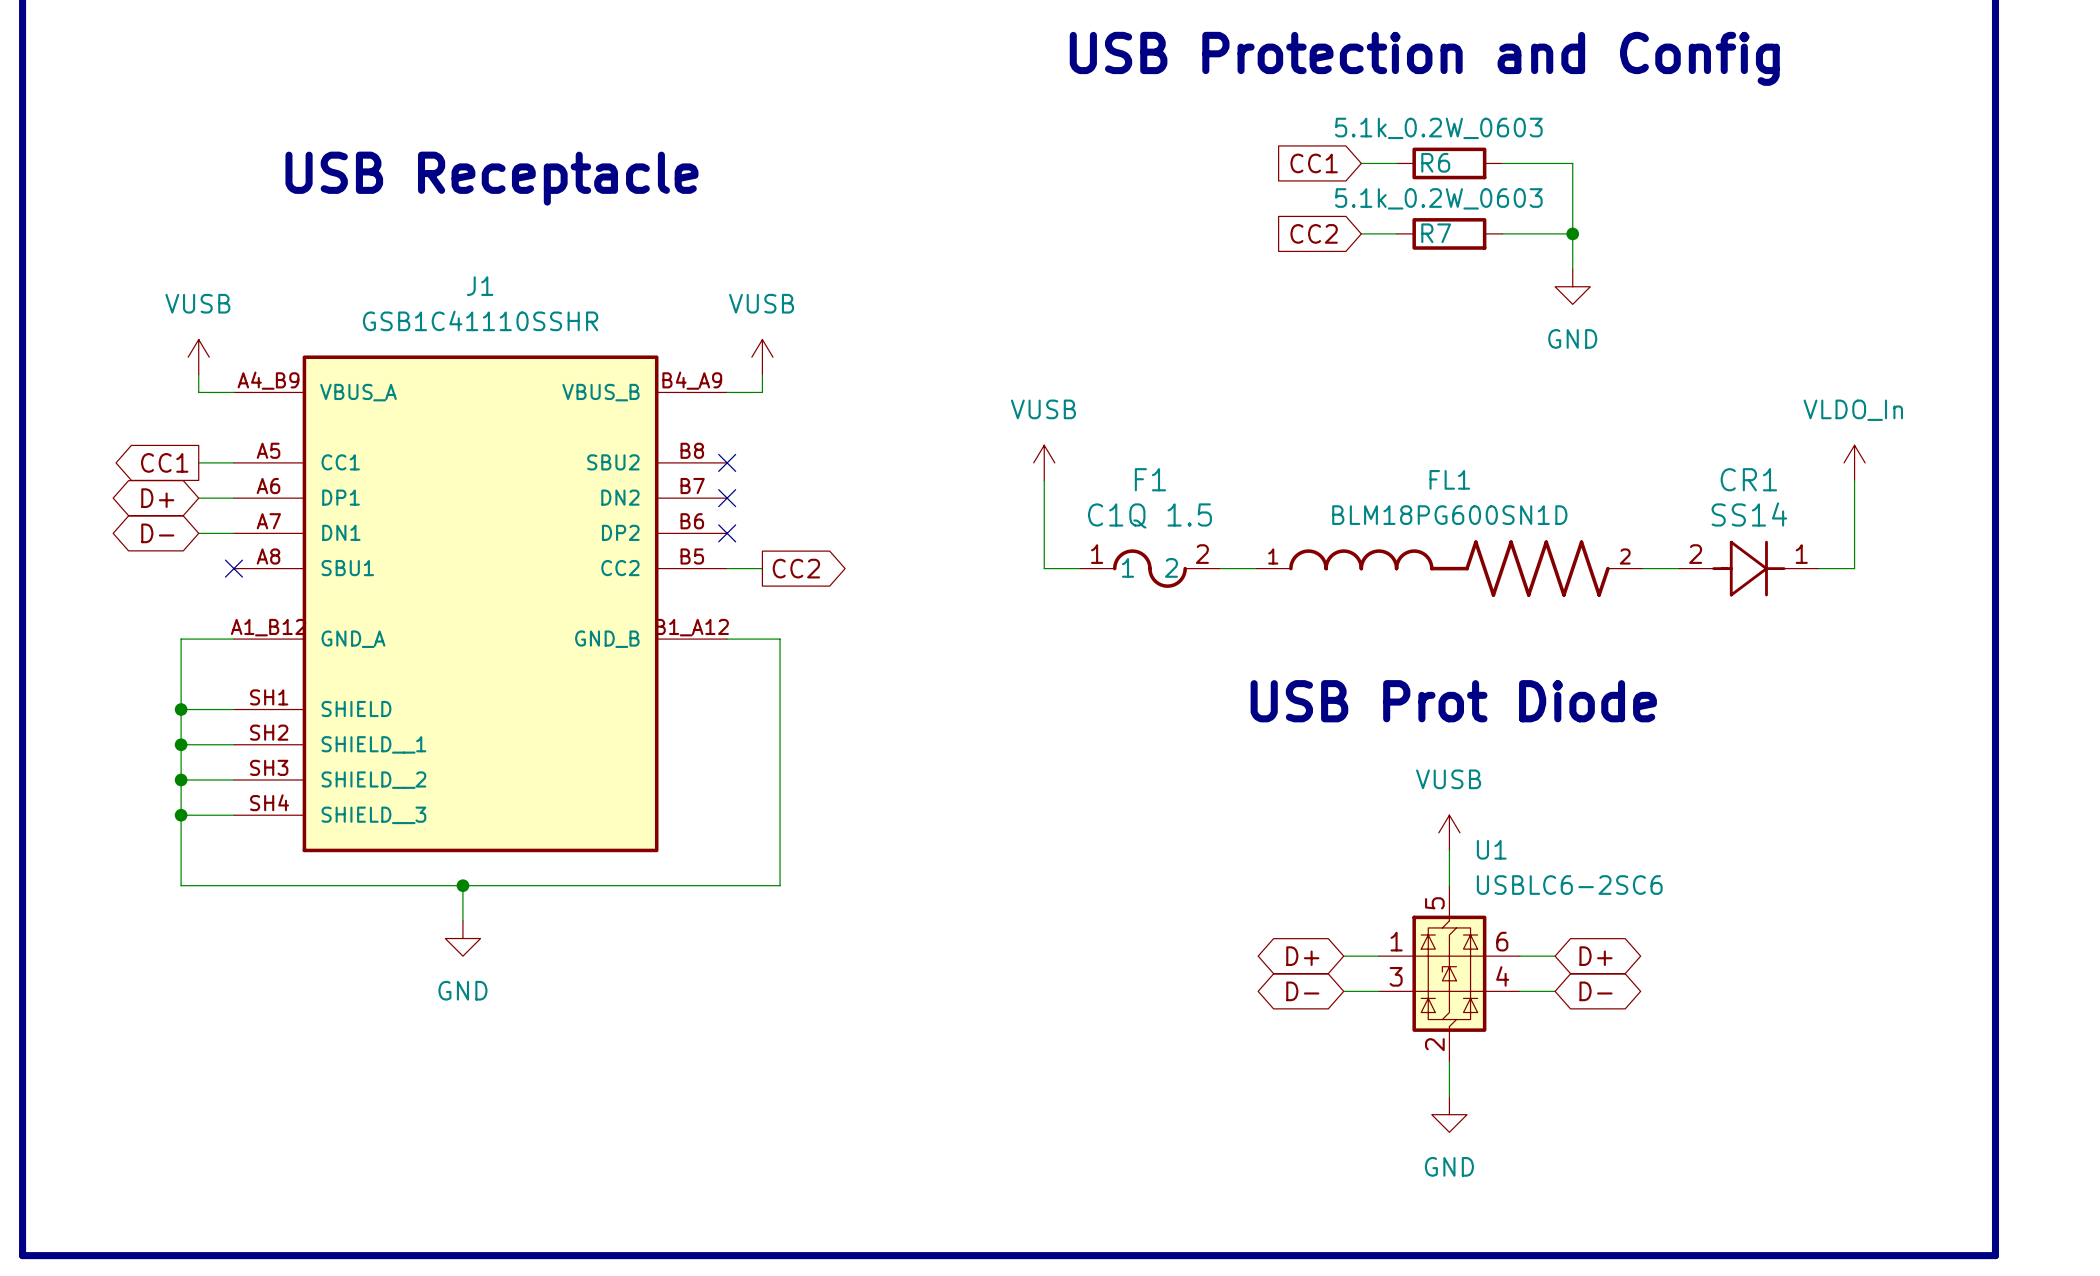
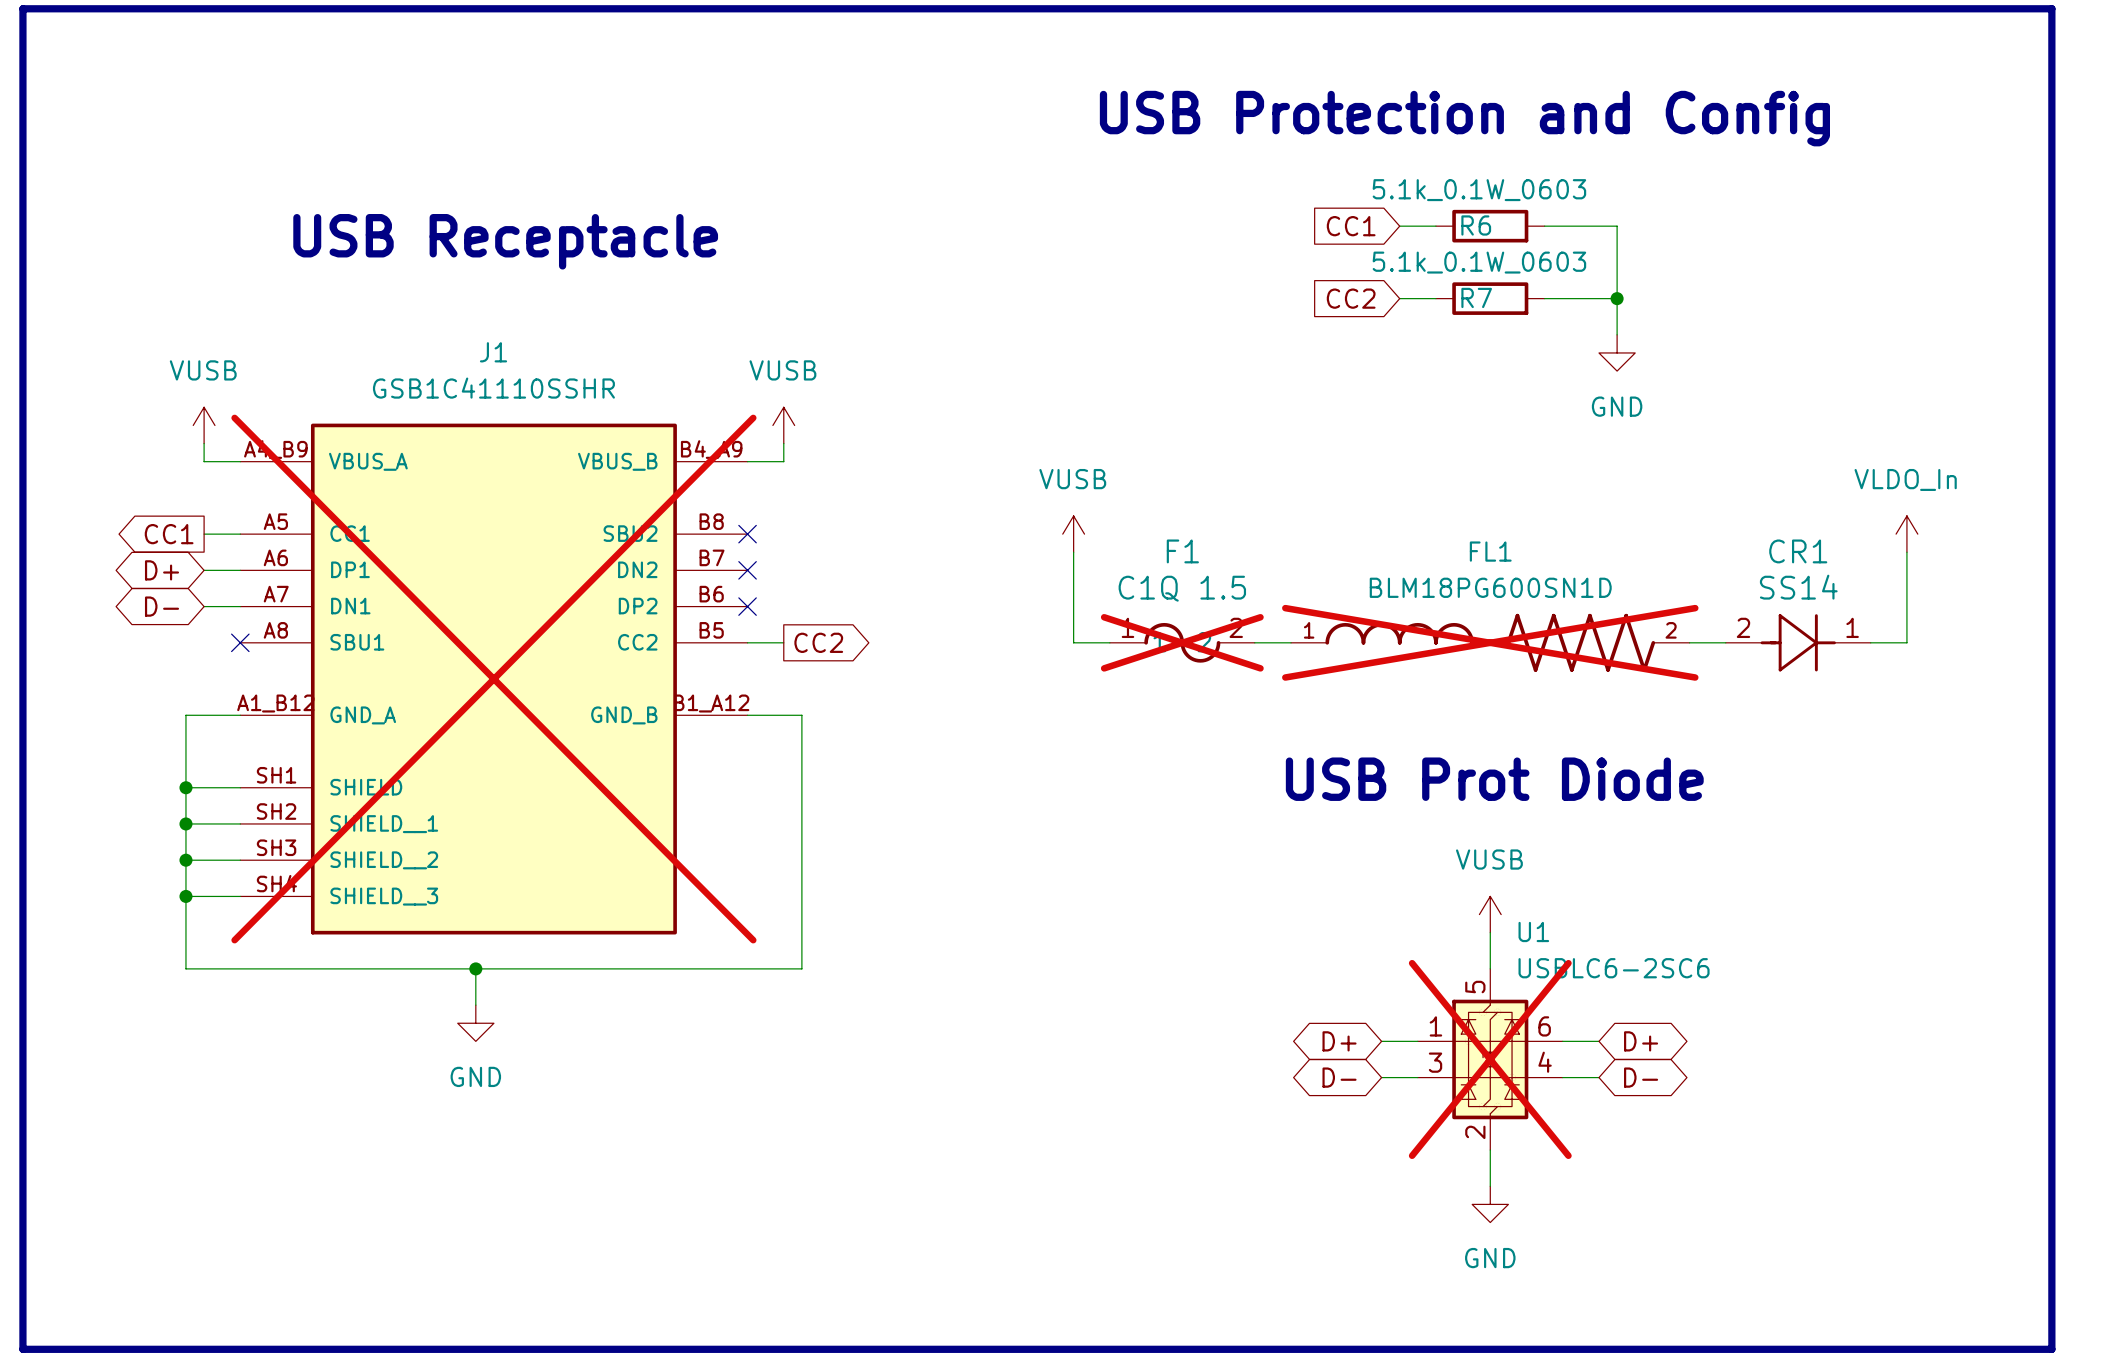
R6 value: 5.1k_0.2W_0603 (1438, 128) -> 5.1k_0.1W_0603 (1479, 190)
R7 value: 5.1k_0.2W_0603 (1438, 198) -> 5.1k_0.1W_0603 (1479, 262)
F1 do-not-place cross: none -> (1182, 642)
FL1 do-not-place cross: none -> (1490, 642)
J1 do-not-place cross: none -> (493, 679)
U1 do-not-place cross: none -> (1490, 1059)

